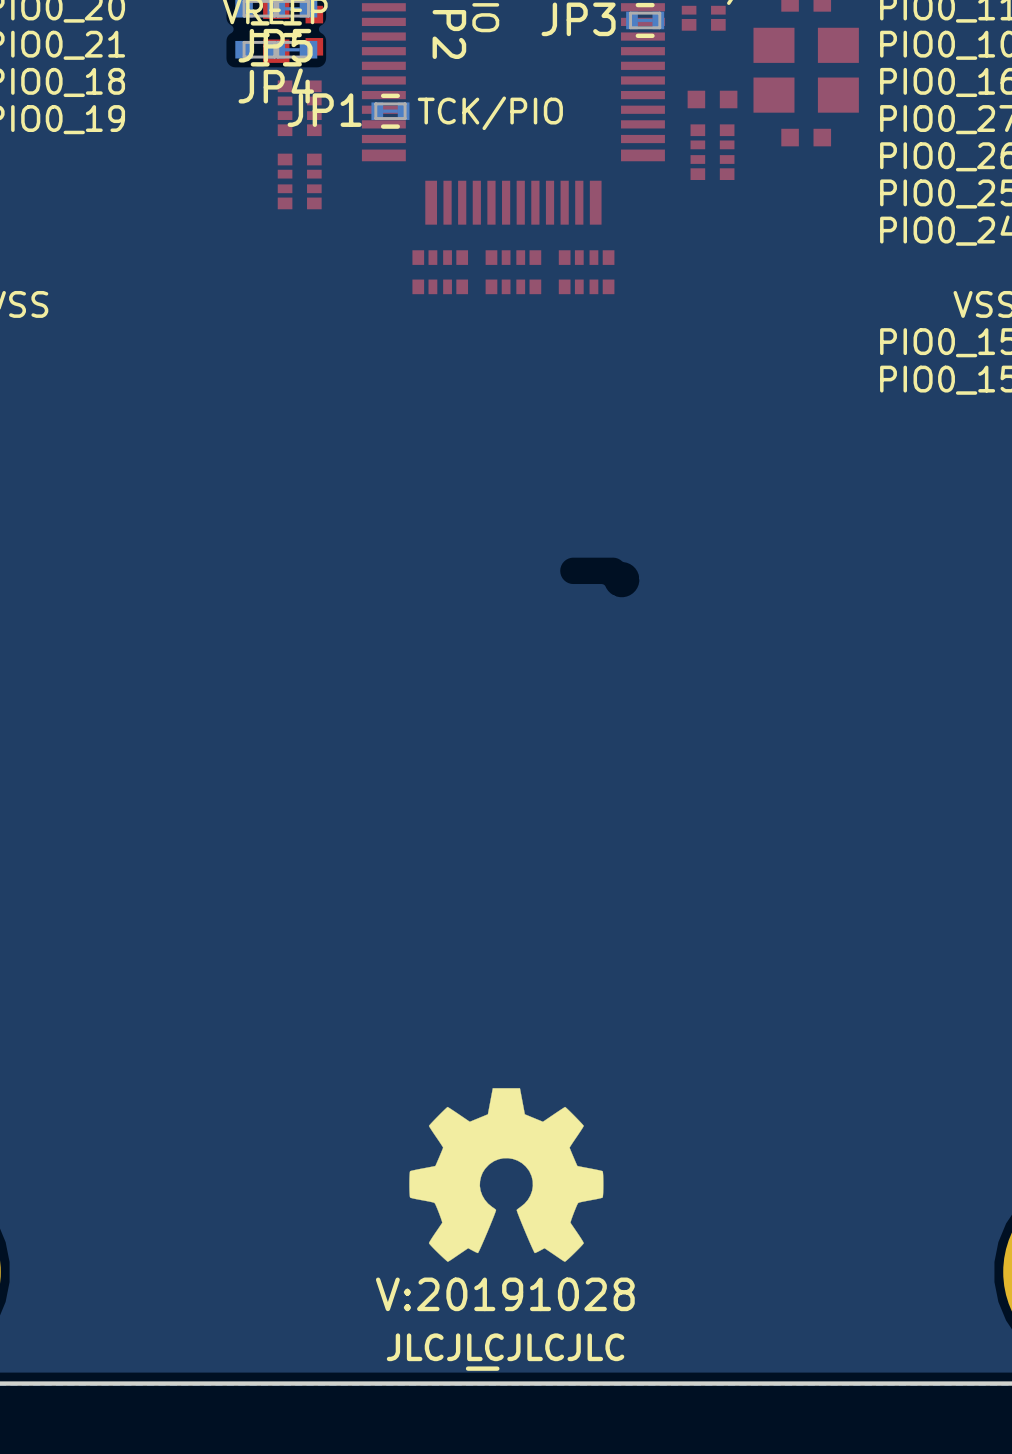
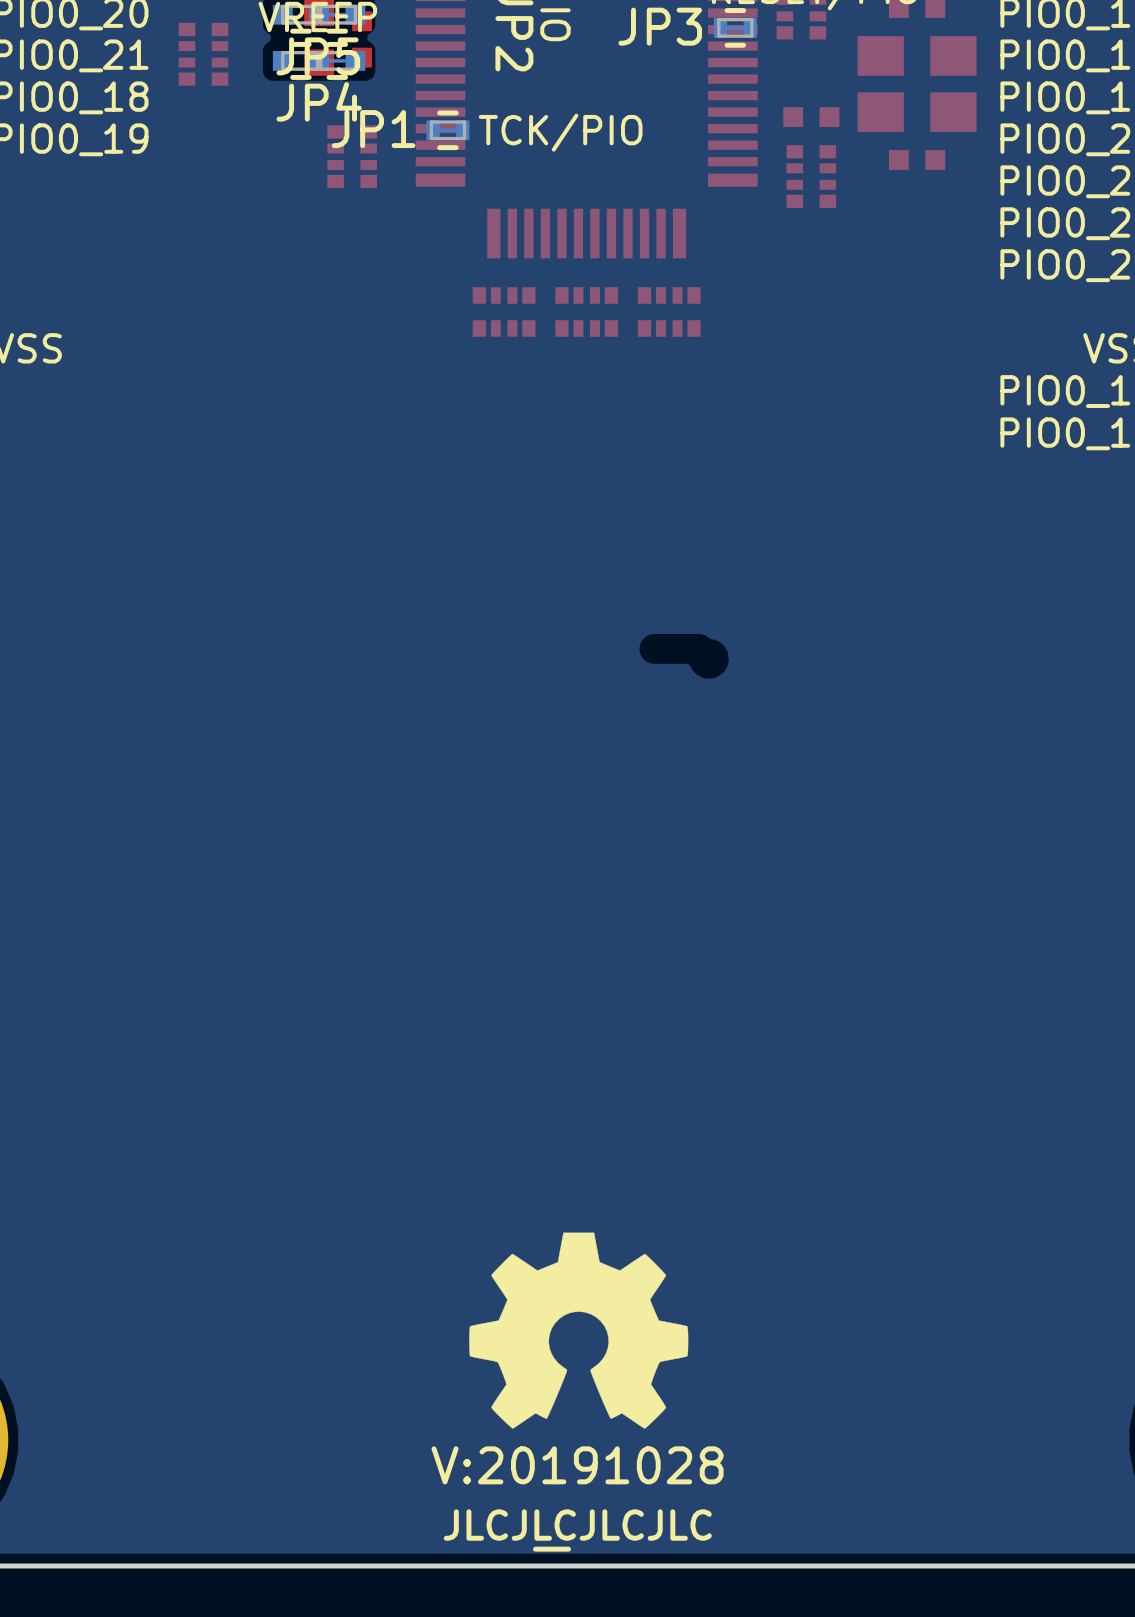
part: none -> (203, 54)
part: (299, 108) -> none
part: none -> (352, 156)
part: (299, 181) -> none

